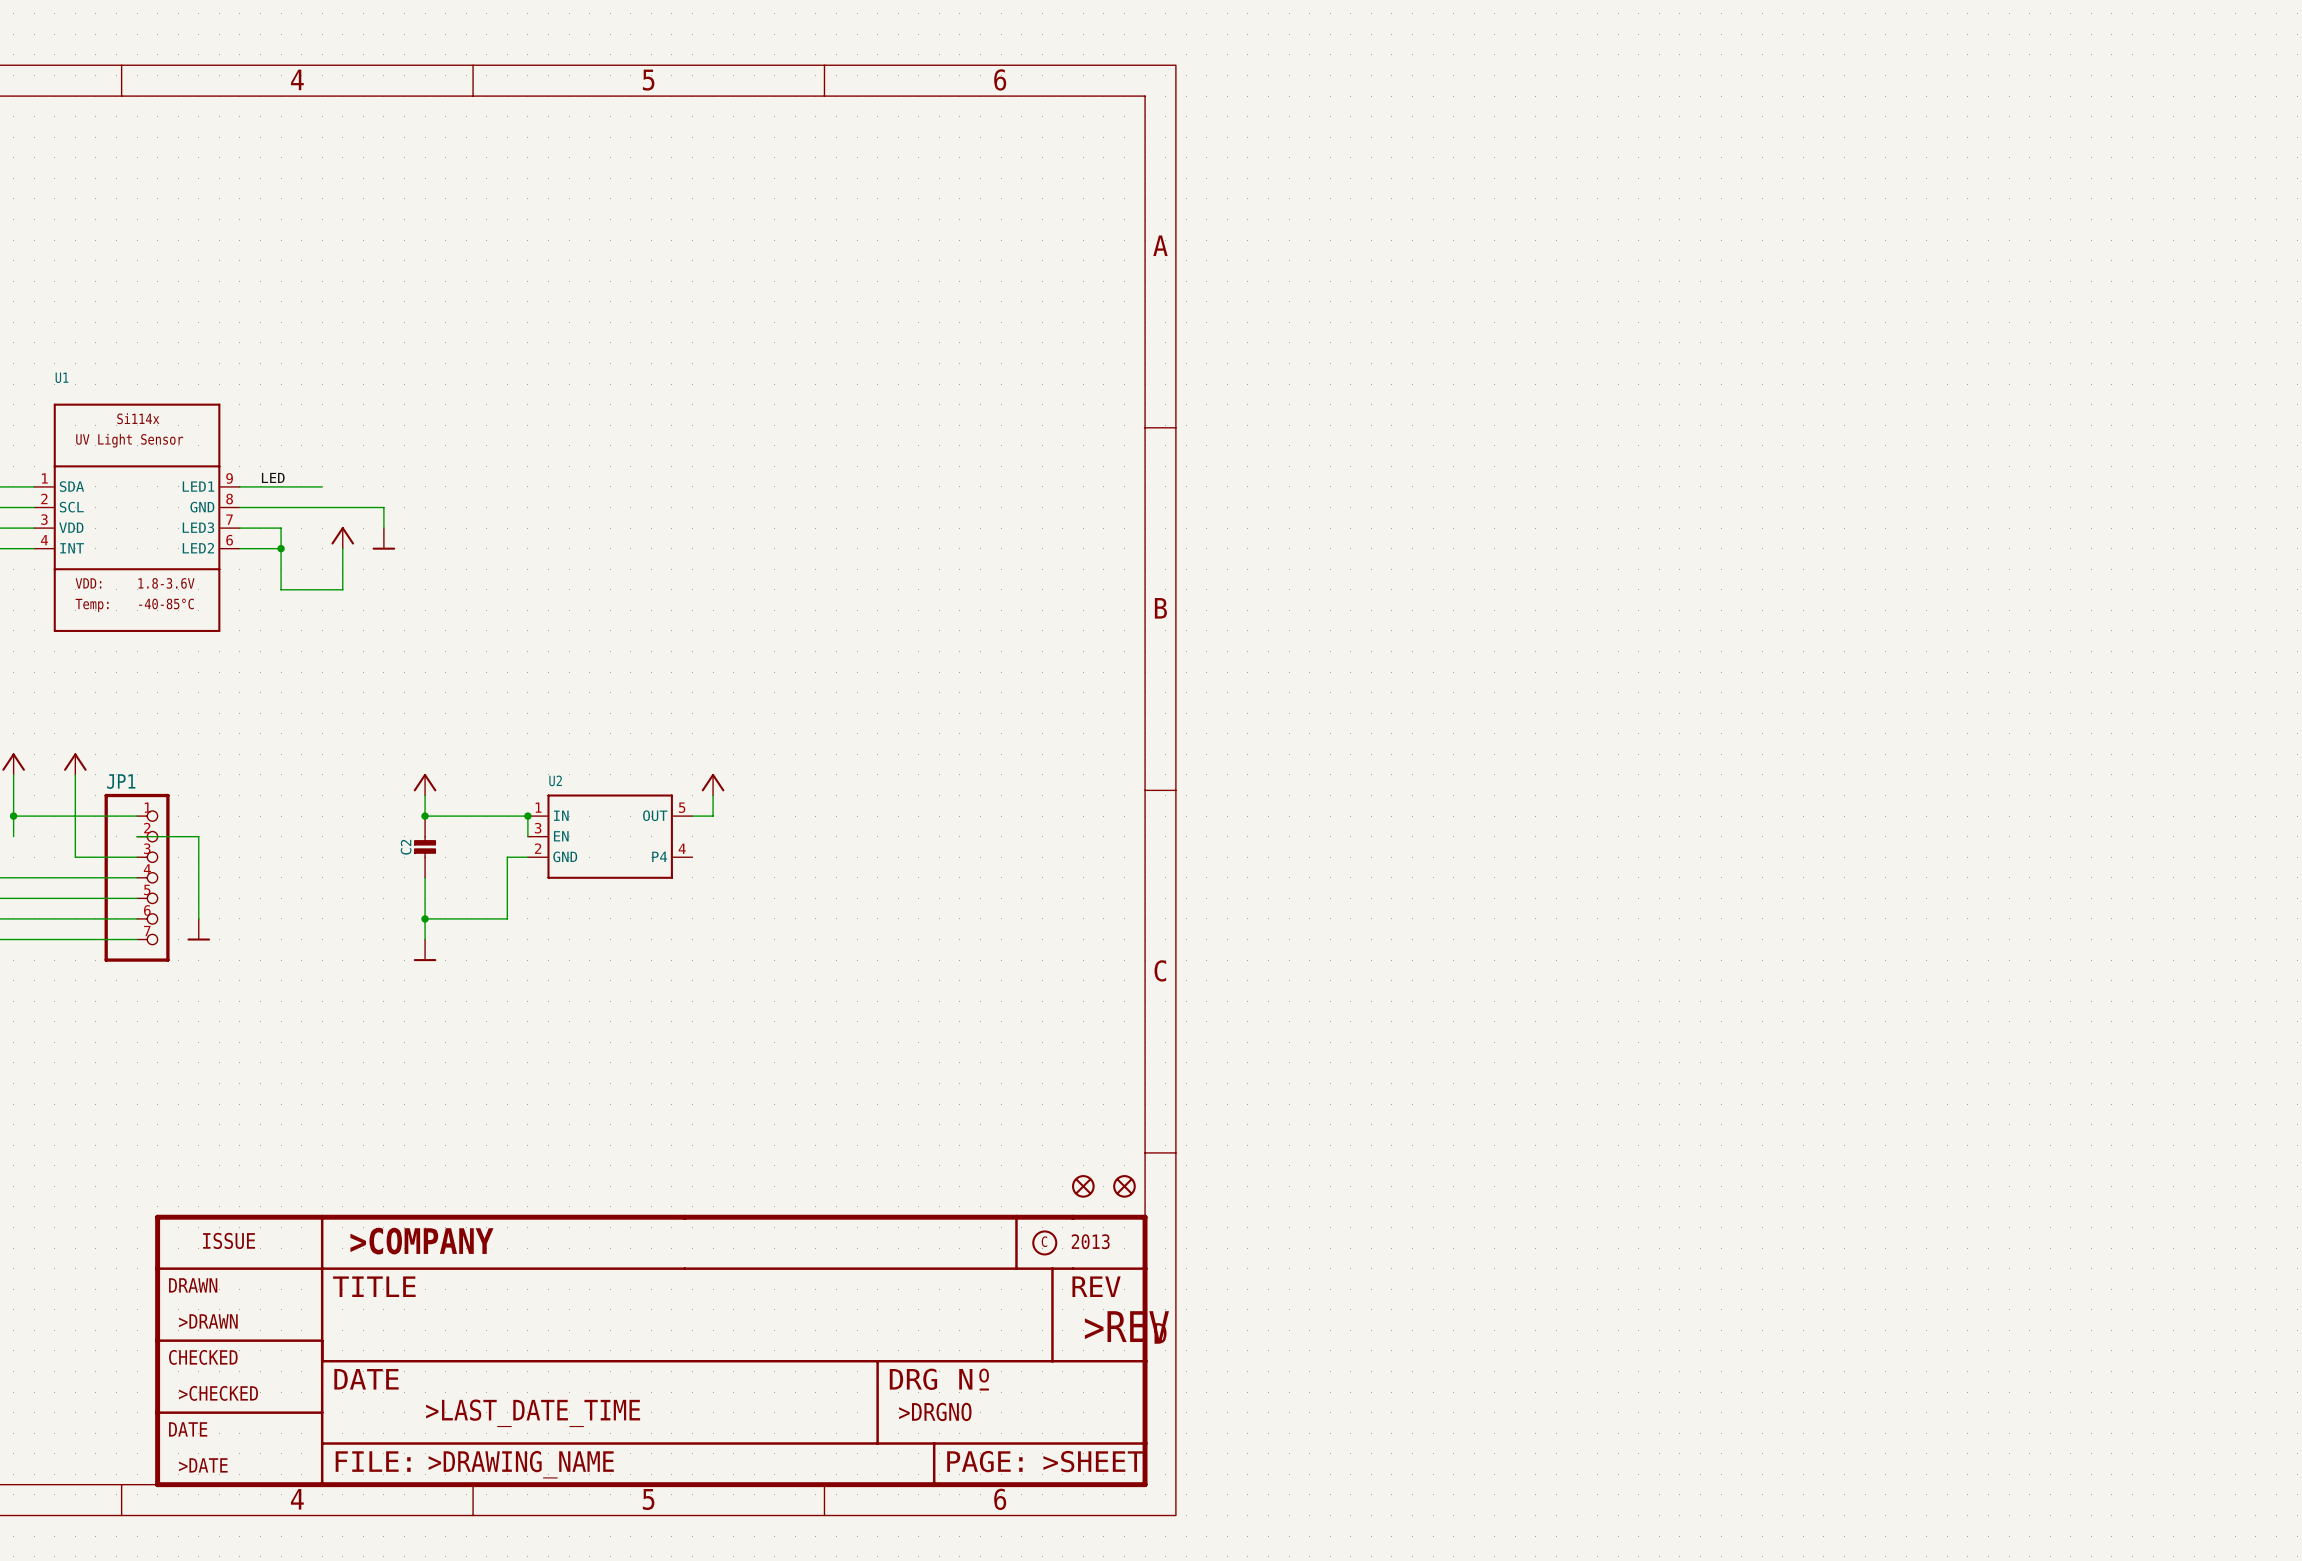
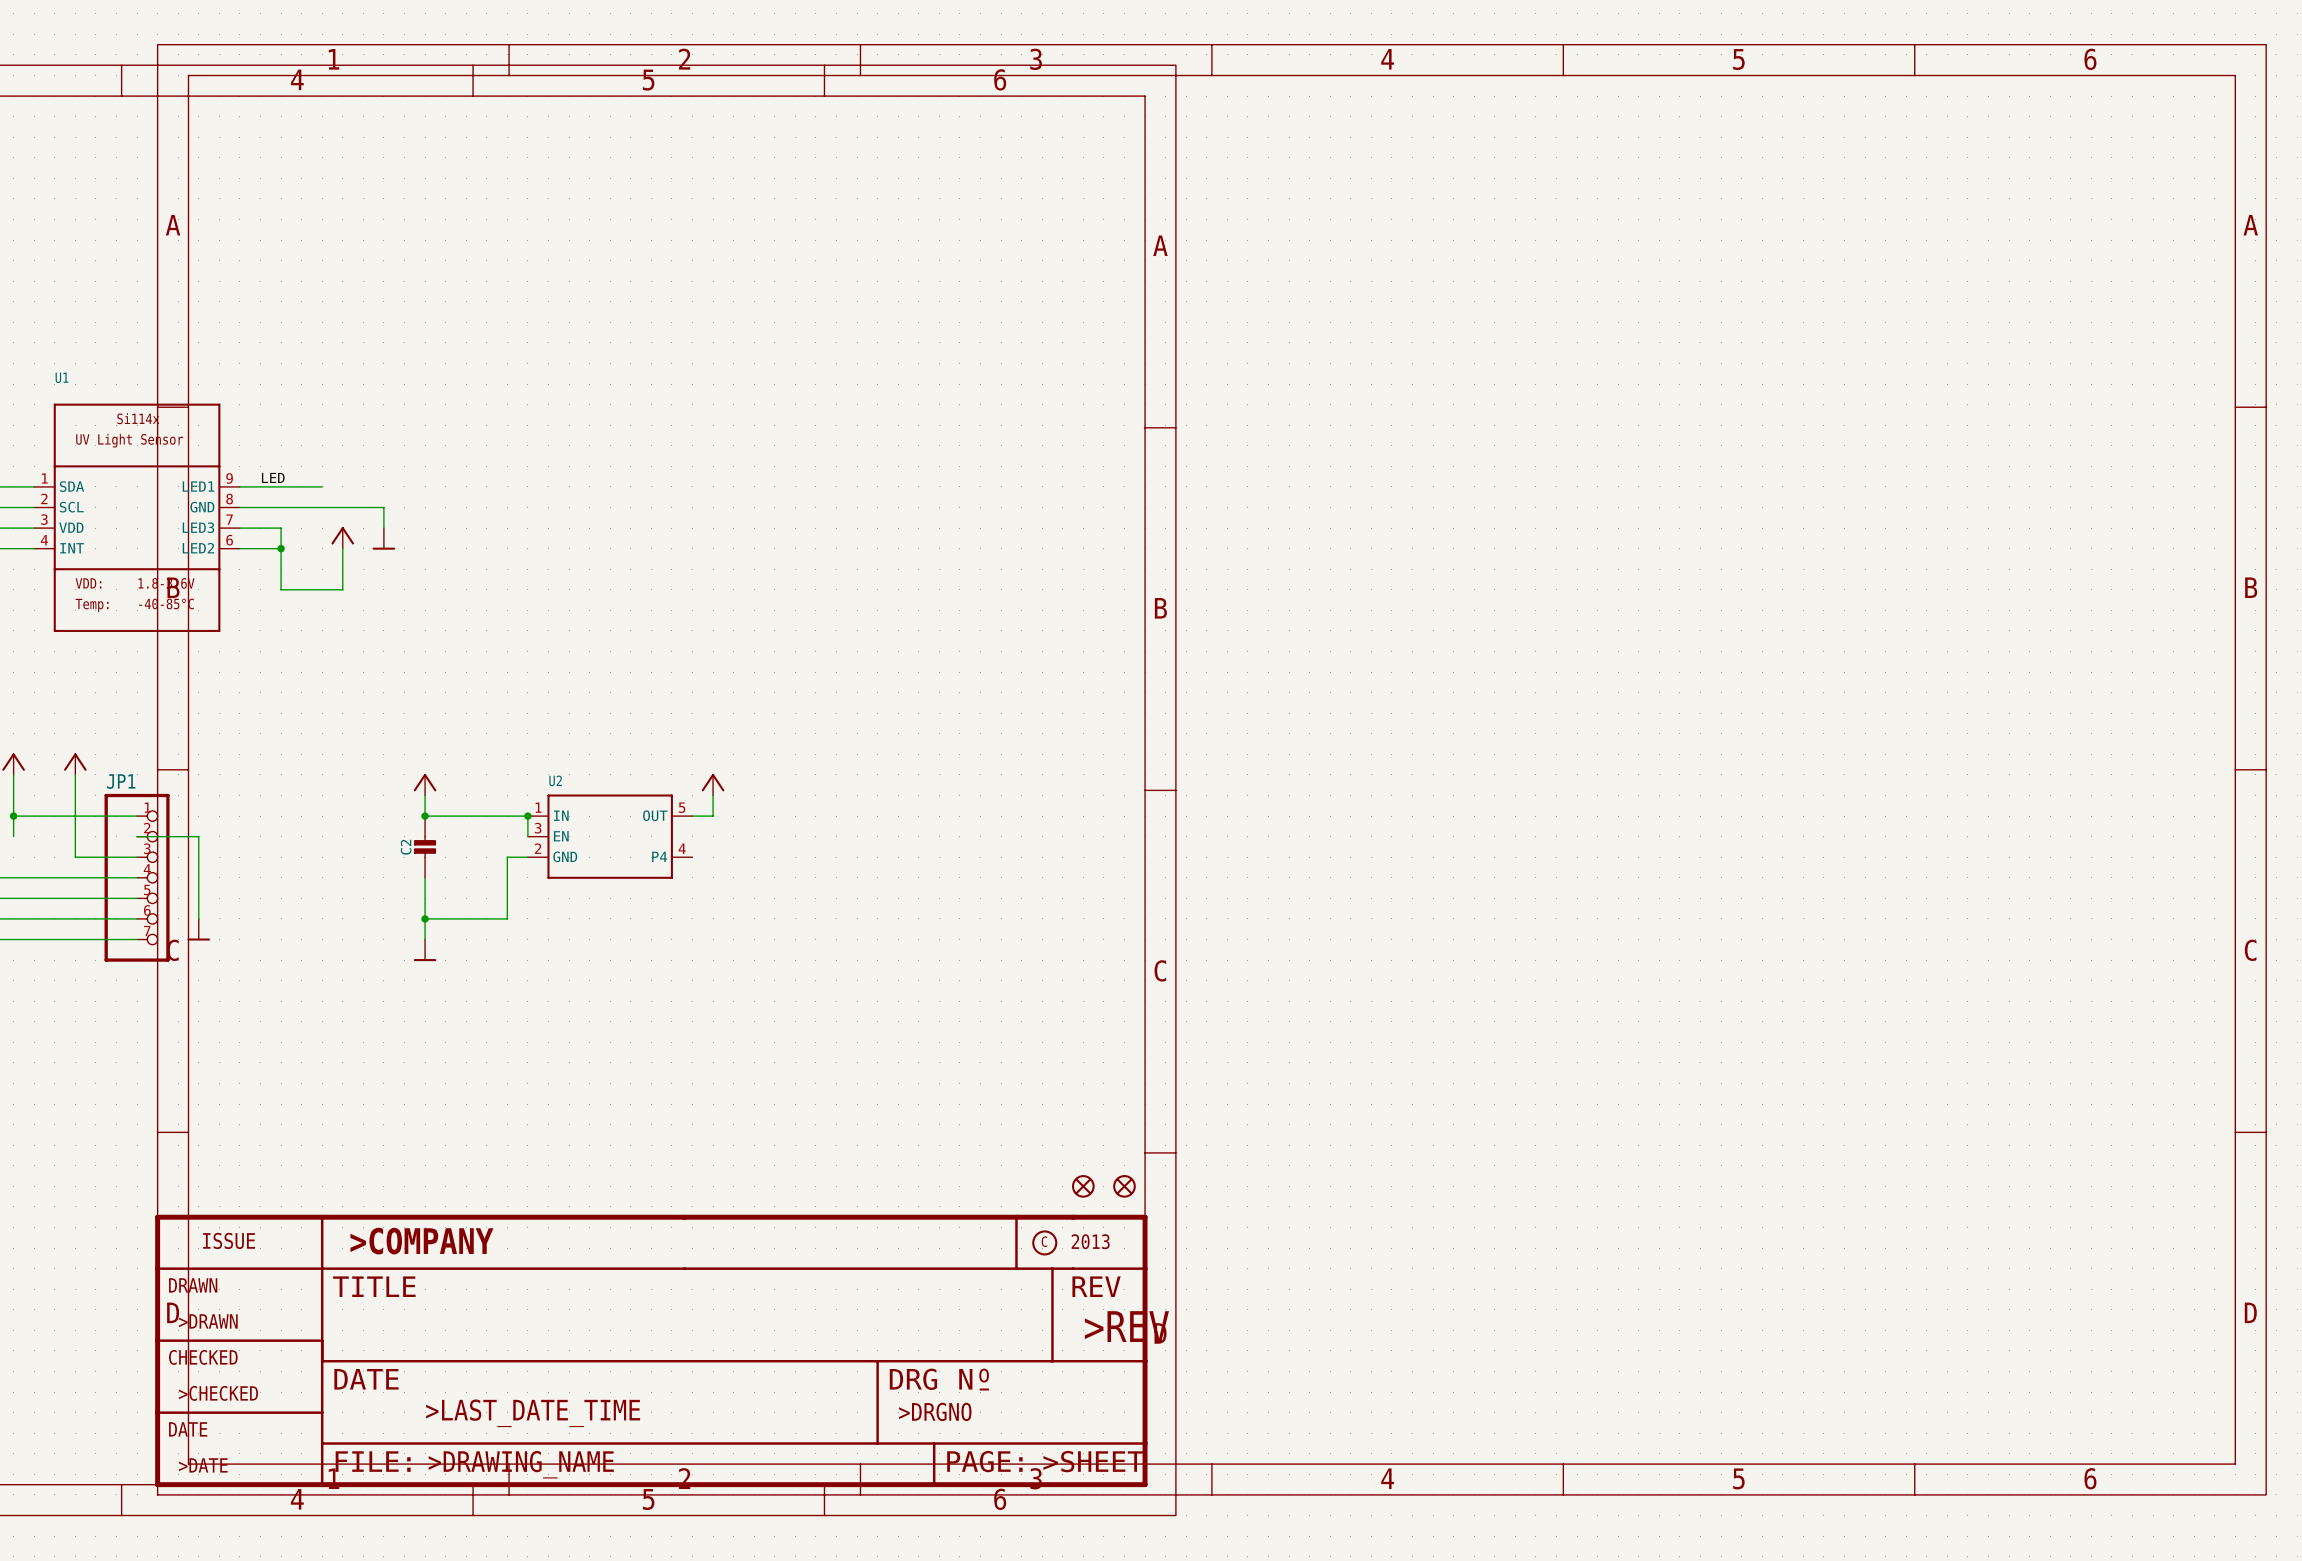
power symbol: none -> (1210, 769)
power symbol: (651, 1350) -> none

